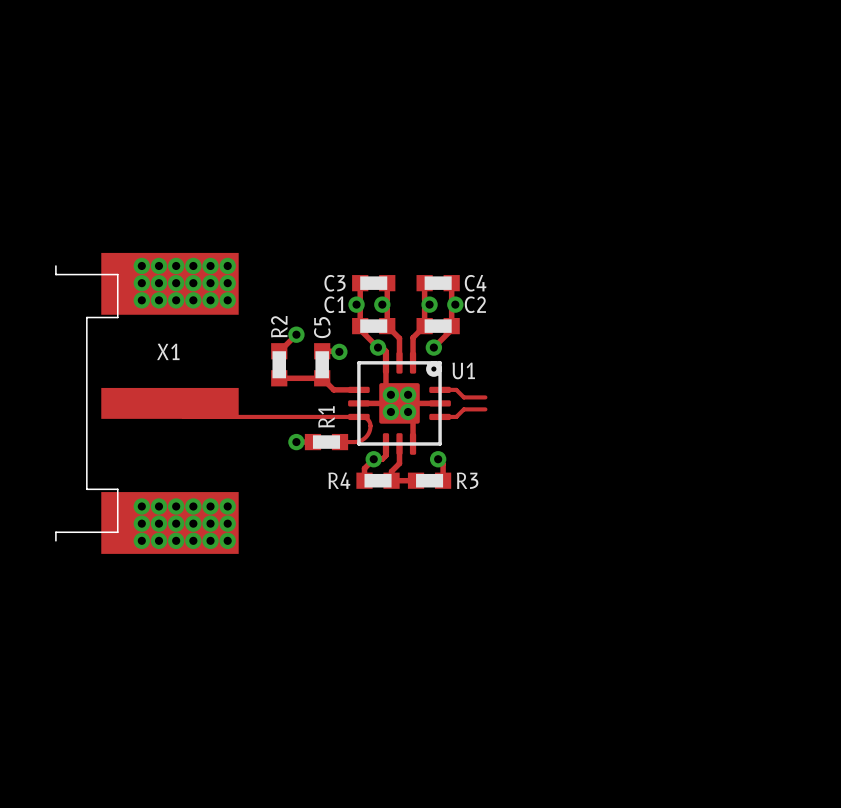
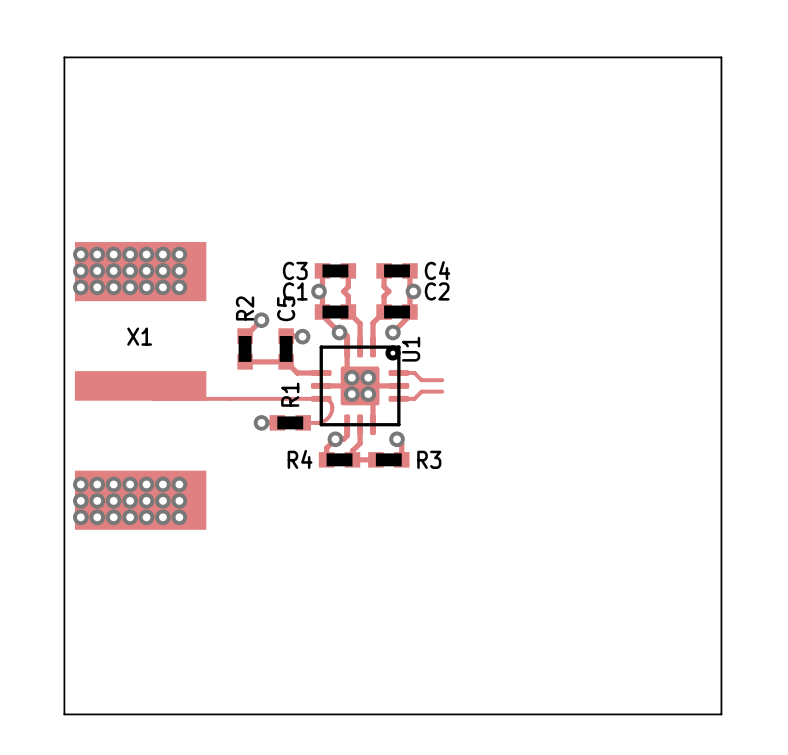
board edge: none -> (64, 57) (721, 57) (721, 714) (64, 714) (64, 57)
board edge: (55, 265) (55, 274) (117, 274) (117, 317) (86, 317) (86, 489) (117, 489) (117, 532) (55, 532) (55, 540) -> none
via: none -> (80, 254)
via: none -> (97, 254)
via: (227, 265) -> none
via: none -> (80, 270)
via: none -> (97, 270)
via: (227, 283) -> none
via: none -> (80, 287)
via: none -> (97, 287)
via: (227, 300) -> none
via: (382, 304) -> none
via: (429, 304) -> none
U1 name rotation: 0° (463, 370) -> 90° counterclockwise (411, 349)
via: none -> (80, 484)
via: none -> (97, 484)
via: (227, 506) -> none
via: none -> (80, 500)
via: none -> (97, 500)
via: (227, 523) -> none
via: none -> (80, 517)
via: none -> (97, 517)
via: (227, 540) -> none

